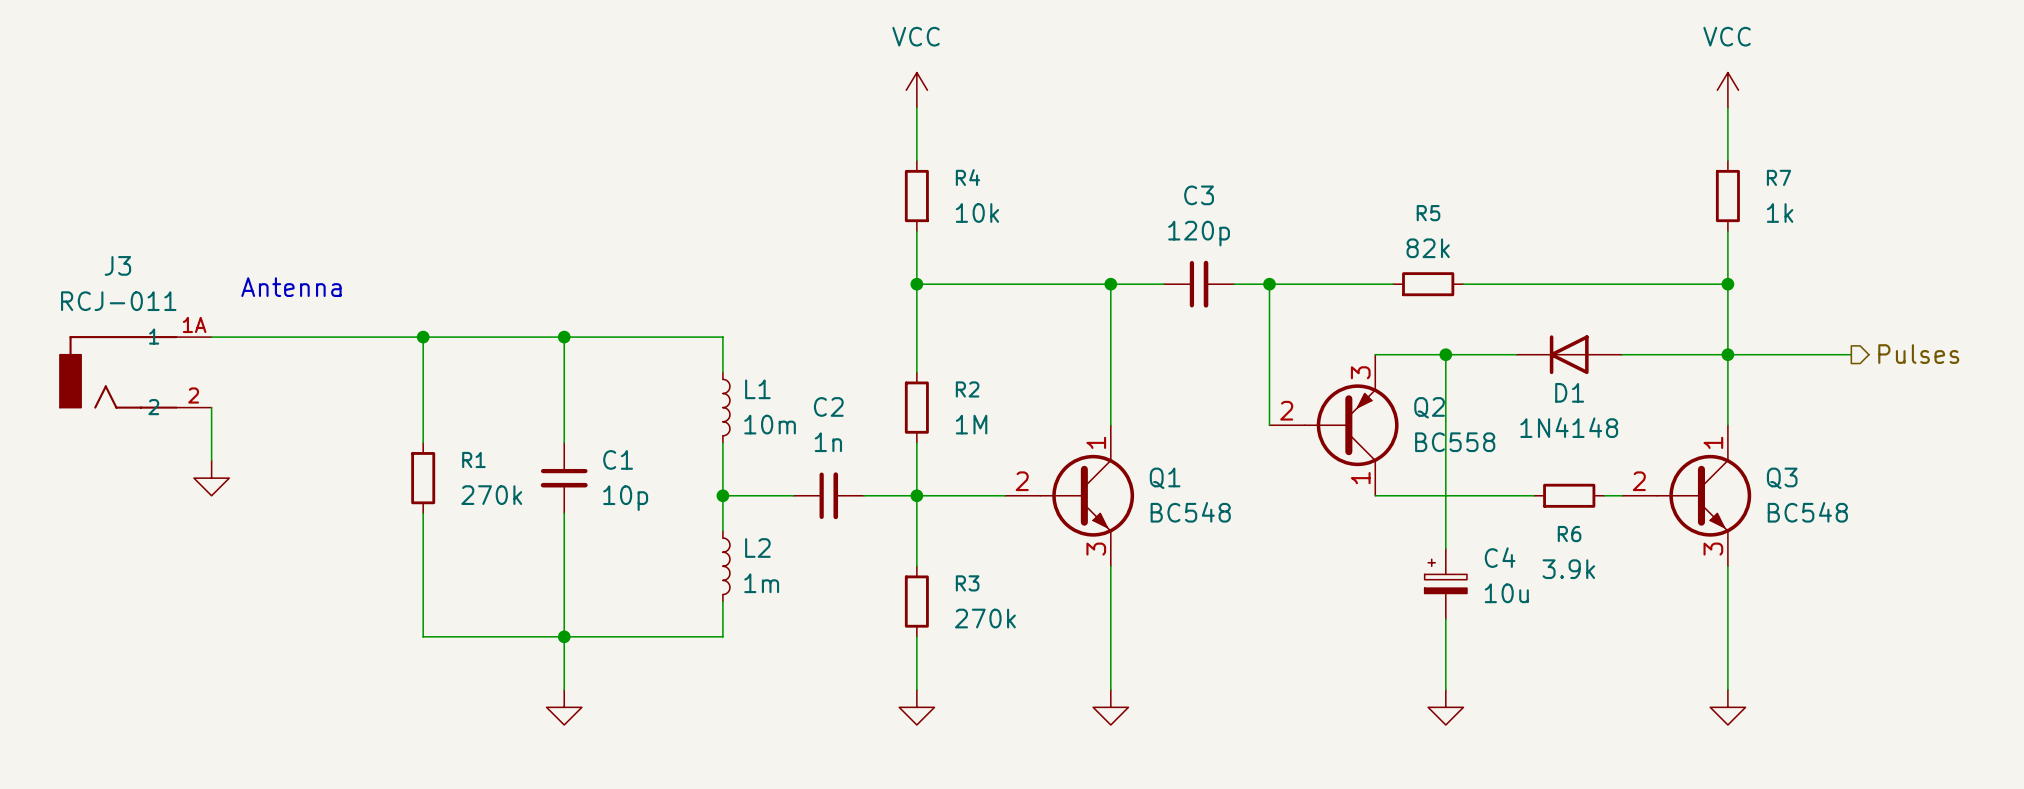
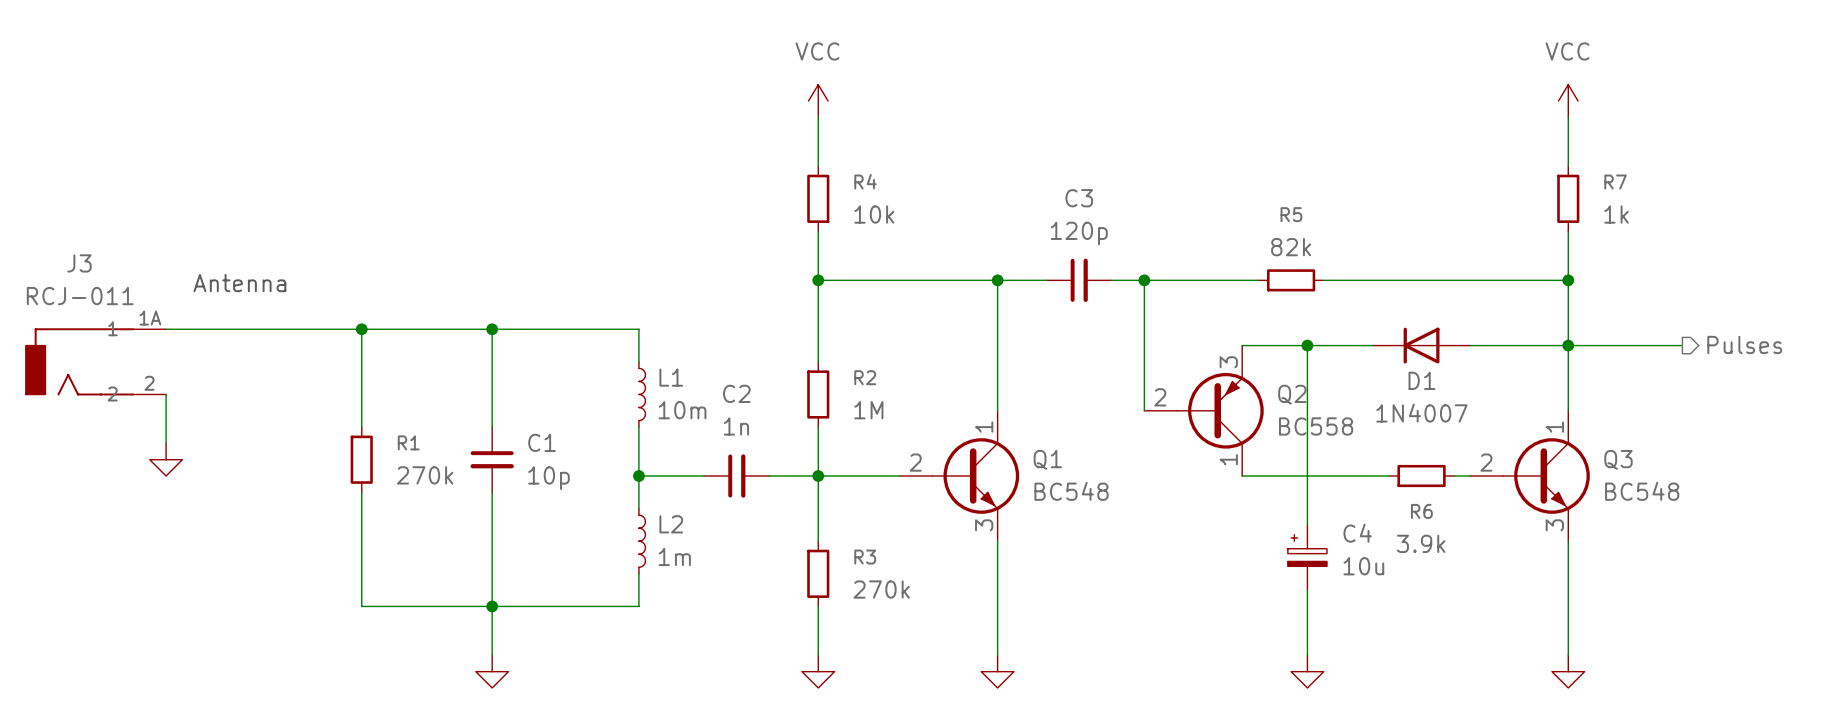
D1 value: 1N4148 (1569, 427) -> 1N4007 (1421, 413)

